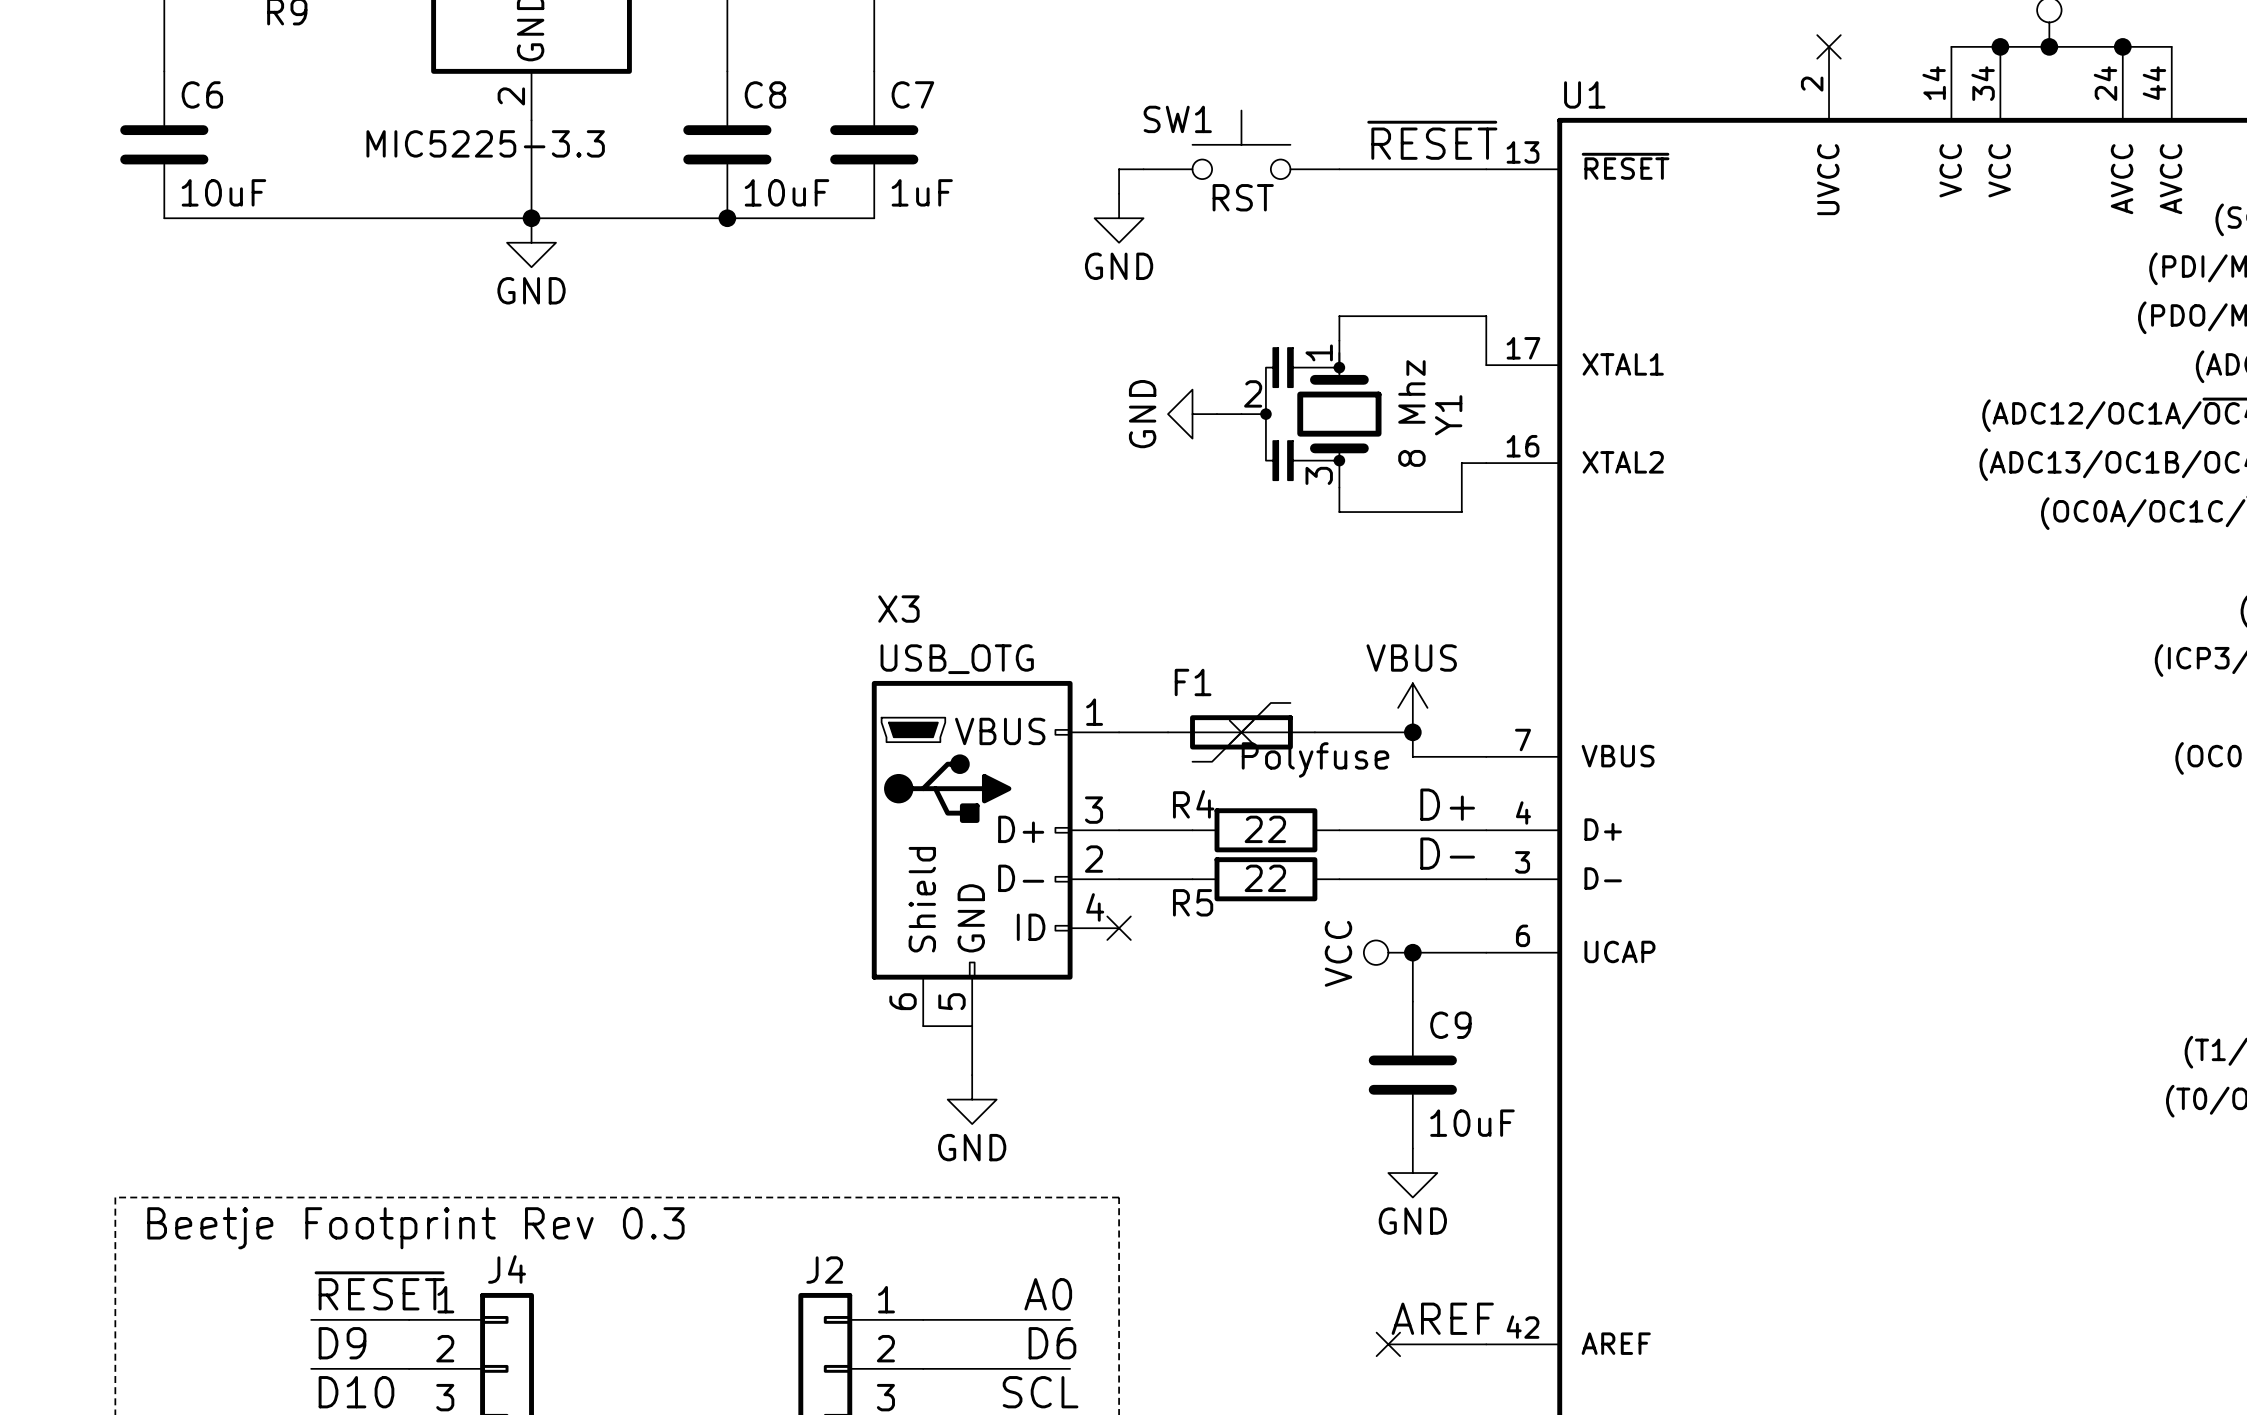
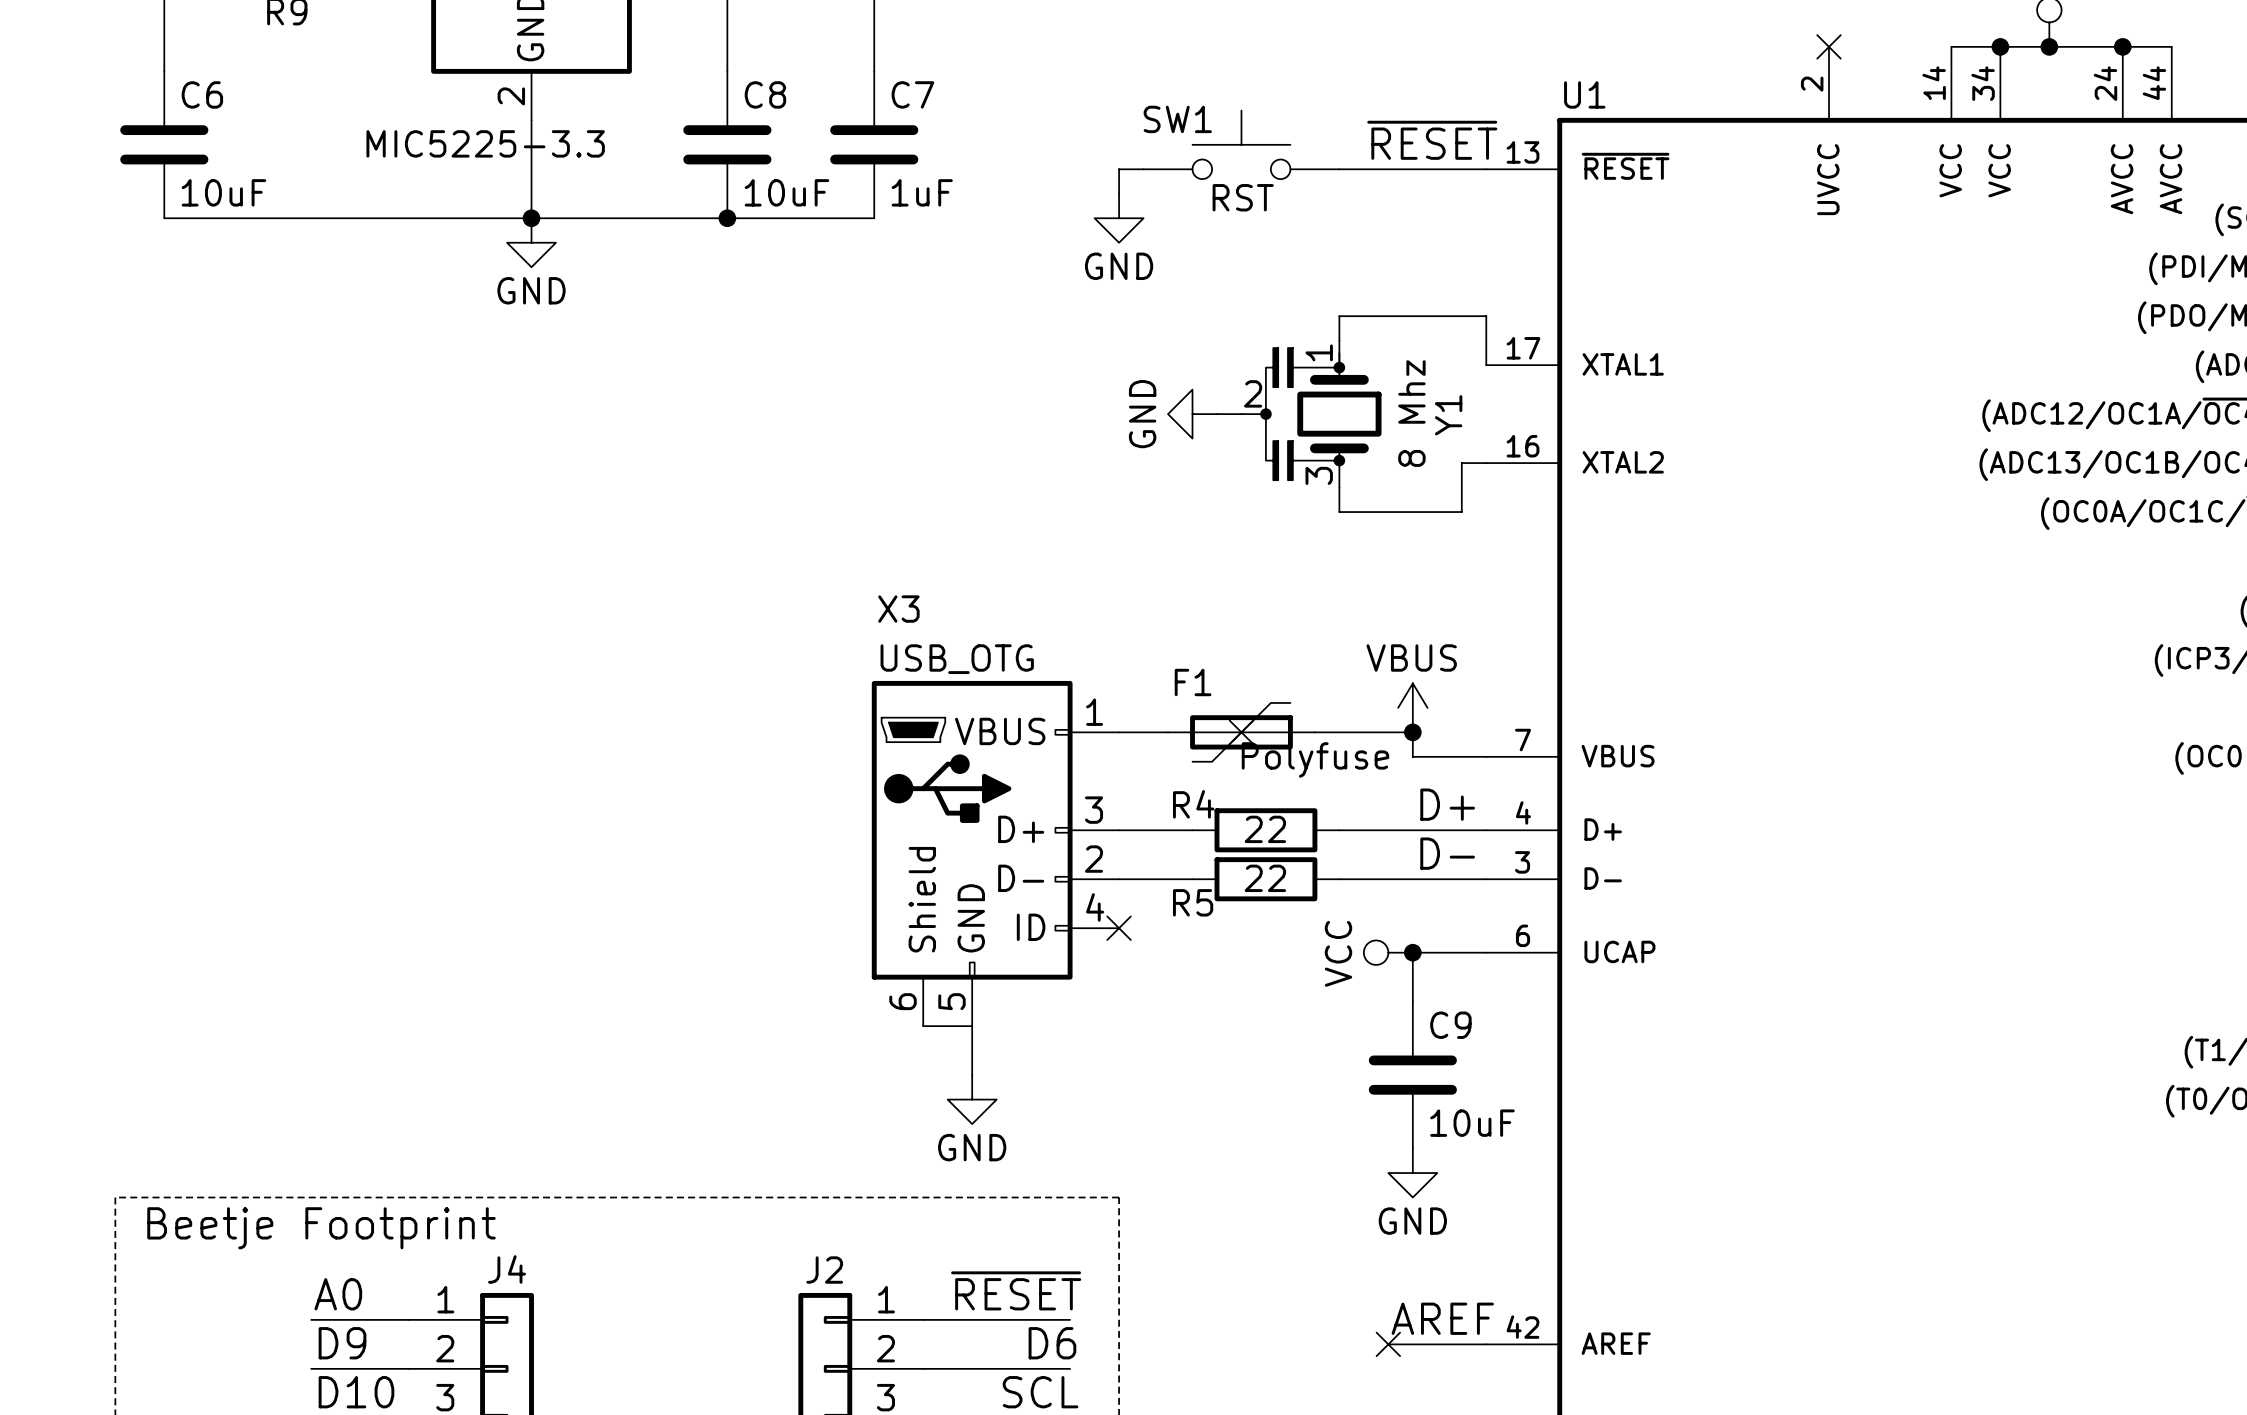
text: Beetje Footprint Rev 0.3 (415, 1228) -> Beetje Footprint (321, 1228)
label: ~{RESET} (379, 1290) -> A0 (338, 1294)
label: none -> ~{RESET} (1016, 1290)
label: A0 (1048, 1294) -> none

